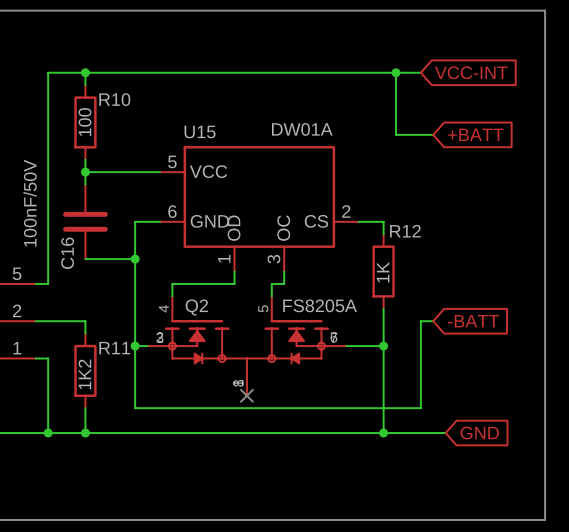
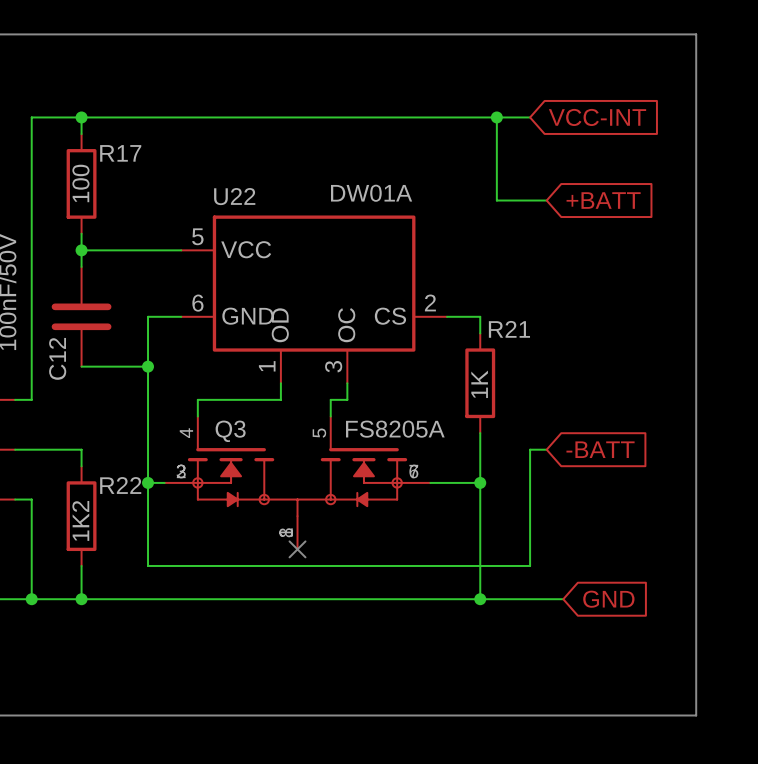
R10 name: R10 (114, 99) -> R17 (120, 153)
U15 name: U15 (200, 132) -> U22 (234, 196)
R12 name: R12 (405, 231) -> R21 (509, 329)
C16 name: C16 (67, 253) -> C12 (57, 358)
Q2 name: Q2 (196, 307) -> Q3 (230, 431)
R11 name: R11 (114, 348) -> R22 (120, 485)

